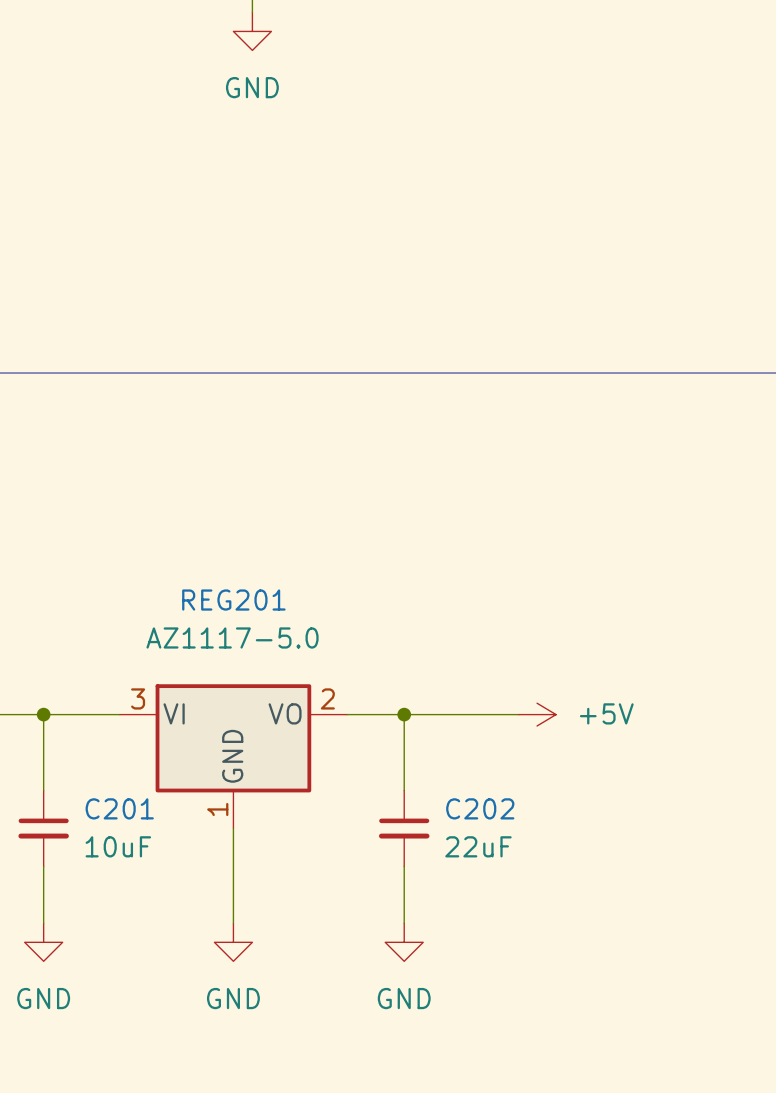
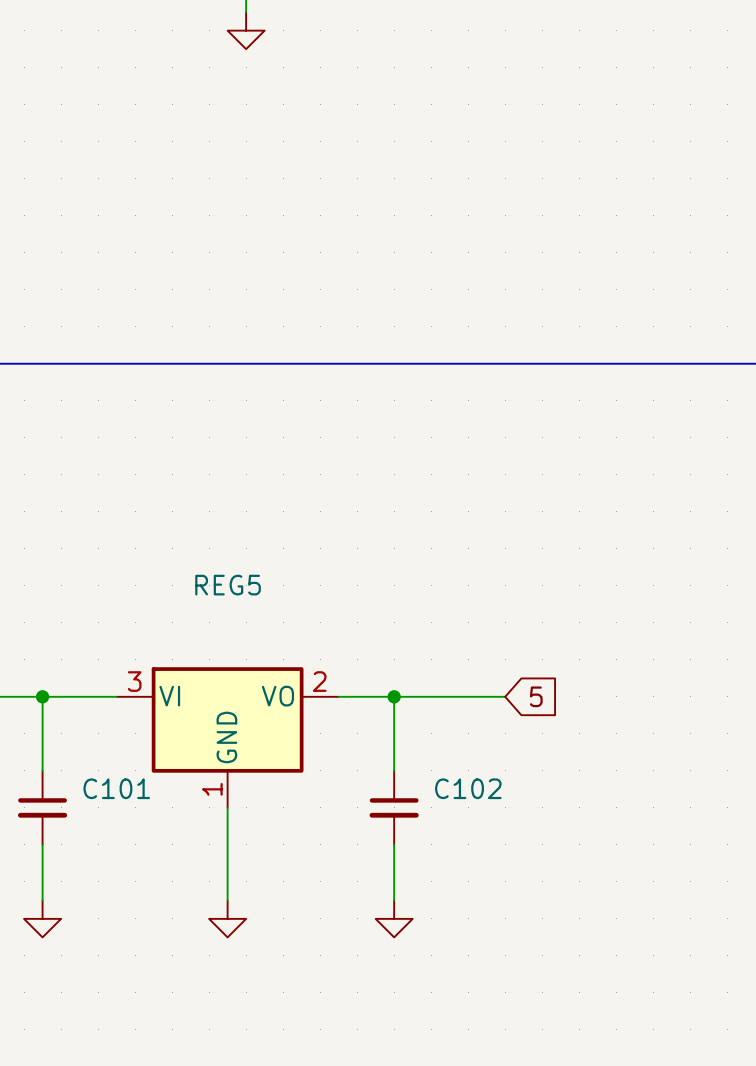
power symbol text: GND (252, 87) -> none
REG201 name: REG201 (233, 600) -> REG5 (228, 585)
REG201 value: AZ1117-5.0 (232, 637) -> none
power symbol: +5V (537, 714) -> none
global label: none -> 5 (536, 696)
C201 name: C201 (119, 808) -> C101 (116, 788)
C202 name: C202 (480, 808) -> C102 (468, 788)
C201 value: 10uF (118, 846) -> none
C202 value: 22uF (478, 846) -> none
power symbol text: GND (43, 998) -> none
power symbol text: GND (233, 998) -> none
power symbol text: GND (404, 998) -> none

